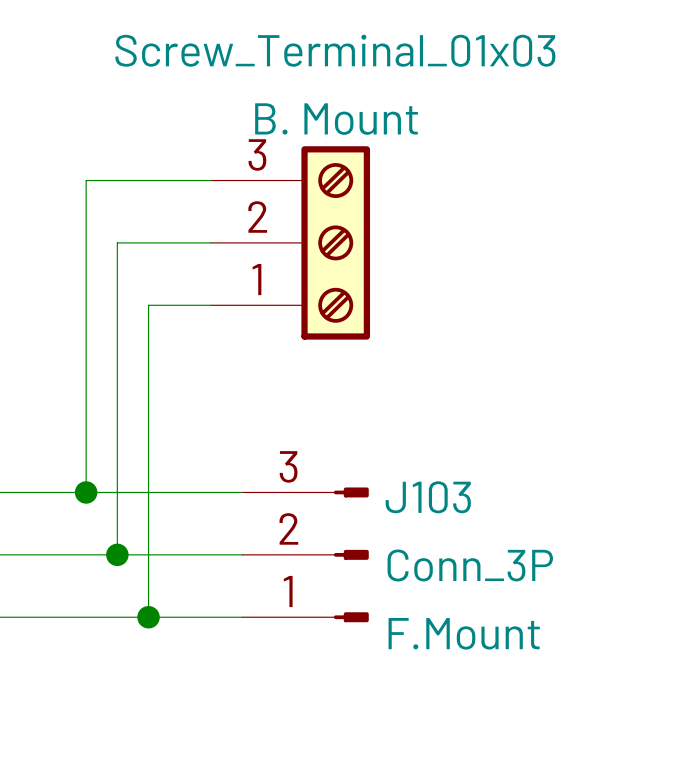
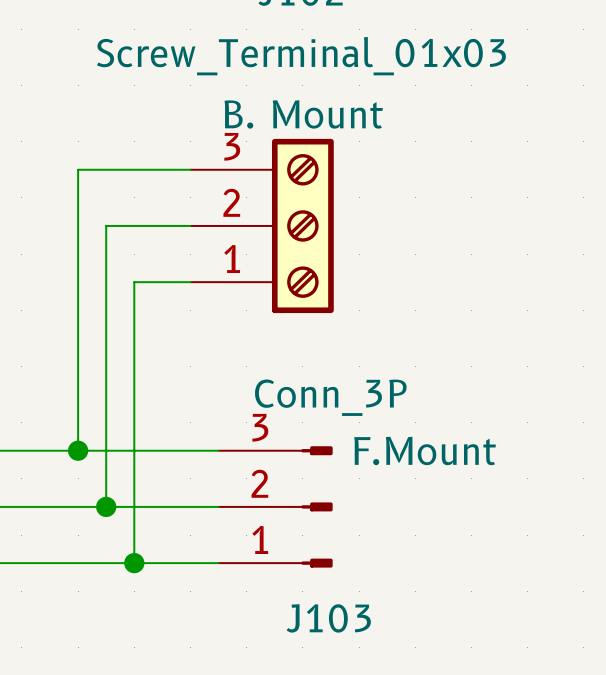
J103 name position: J103 (428, 497) -> J103 (328, 618)
J103 value position: Conn_3P (470, 565) -> Conn_3P (330, 397)
J103 text position: F.Mount (464, 633) -> F.Mount (425, 450)

